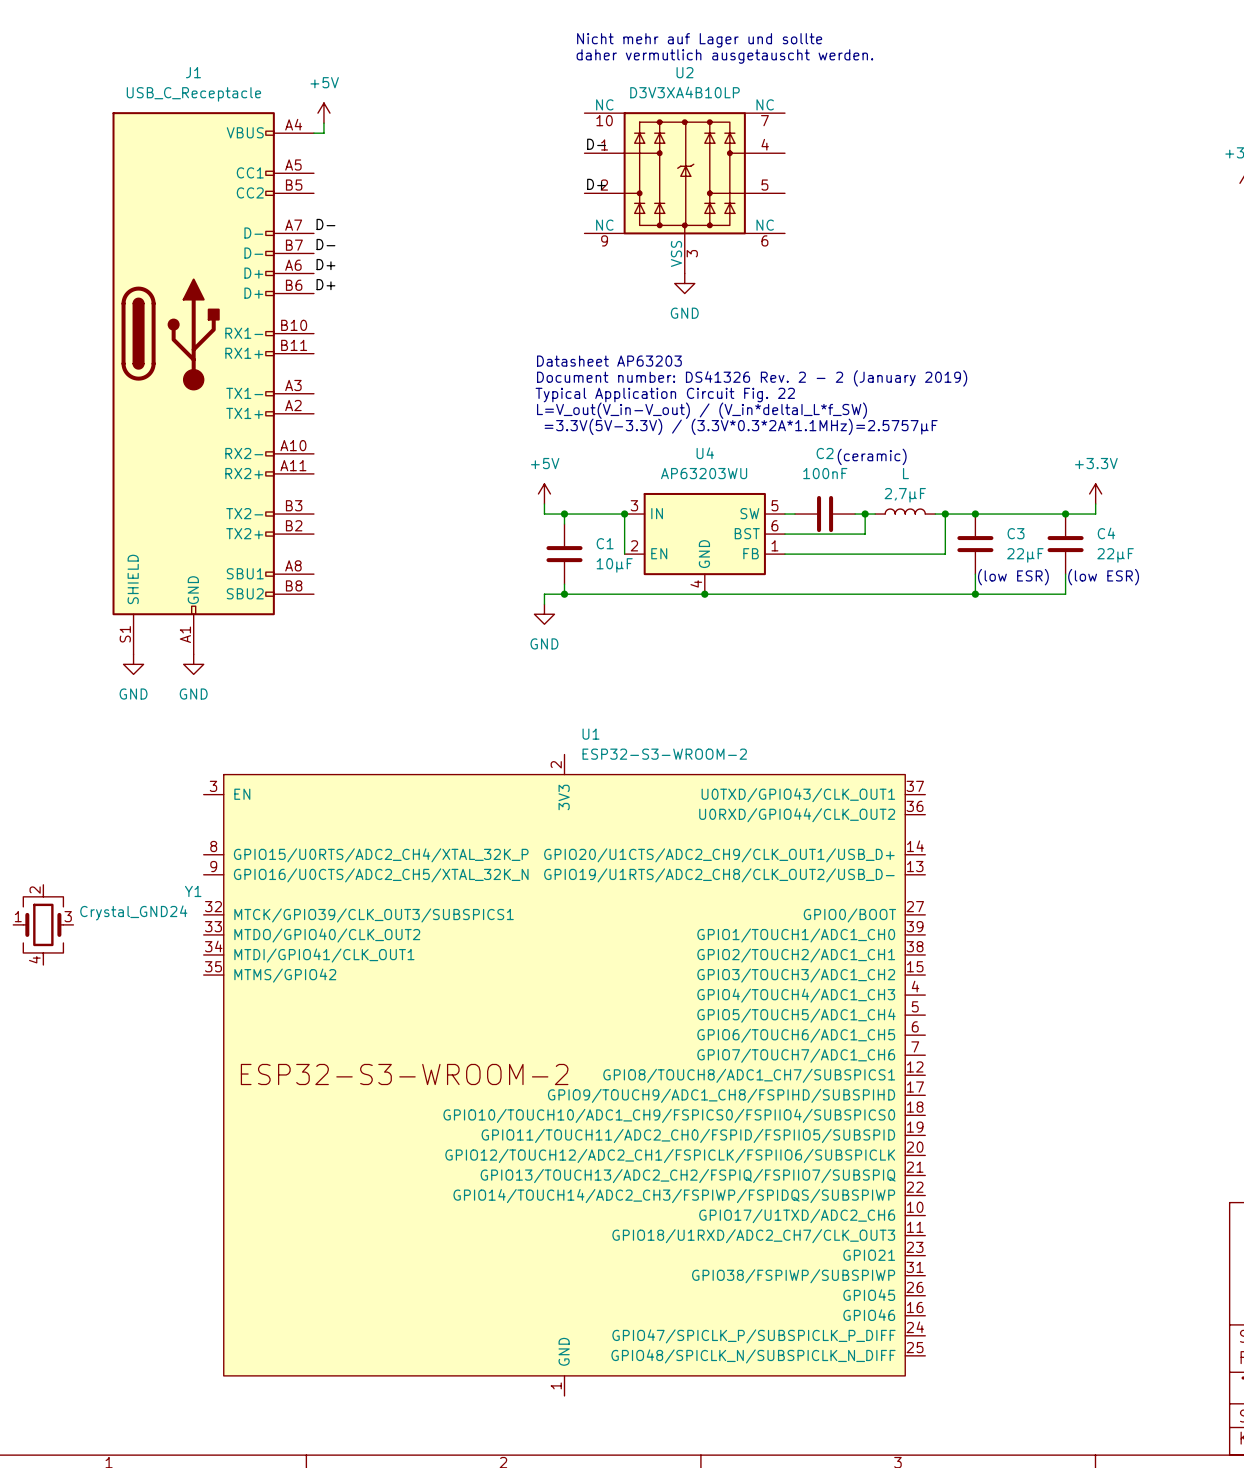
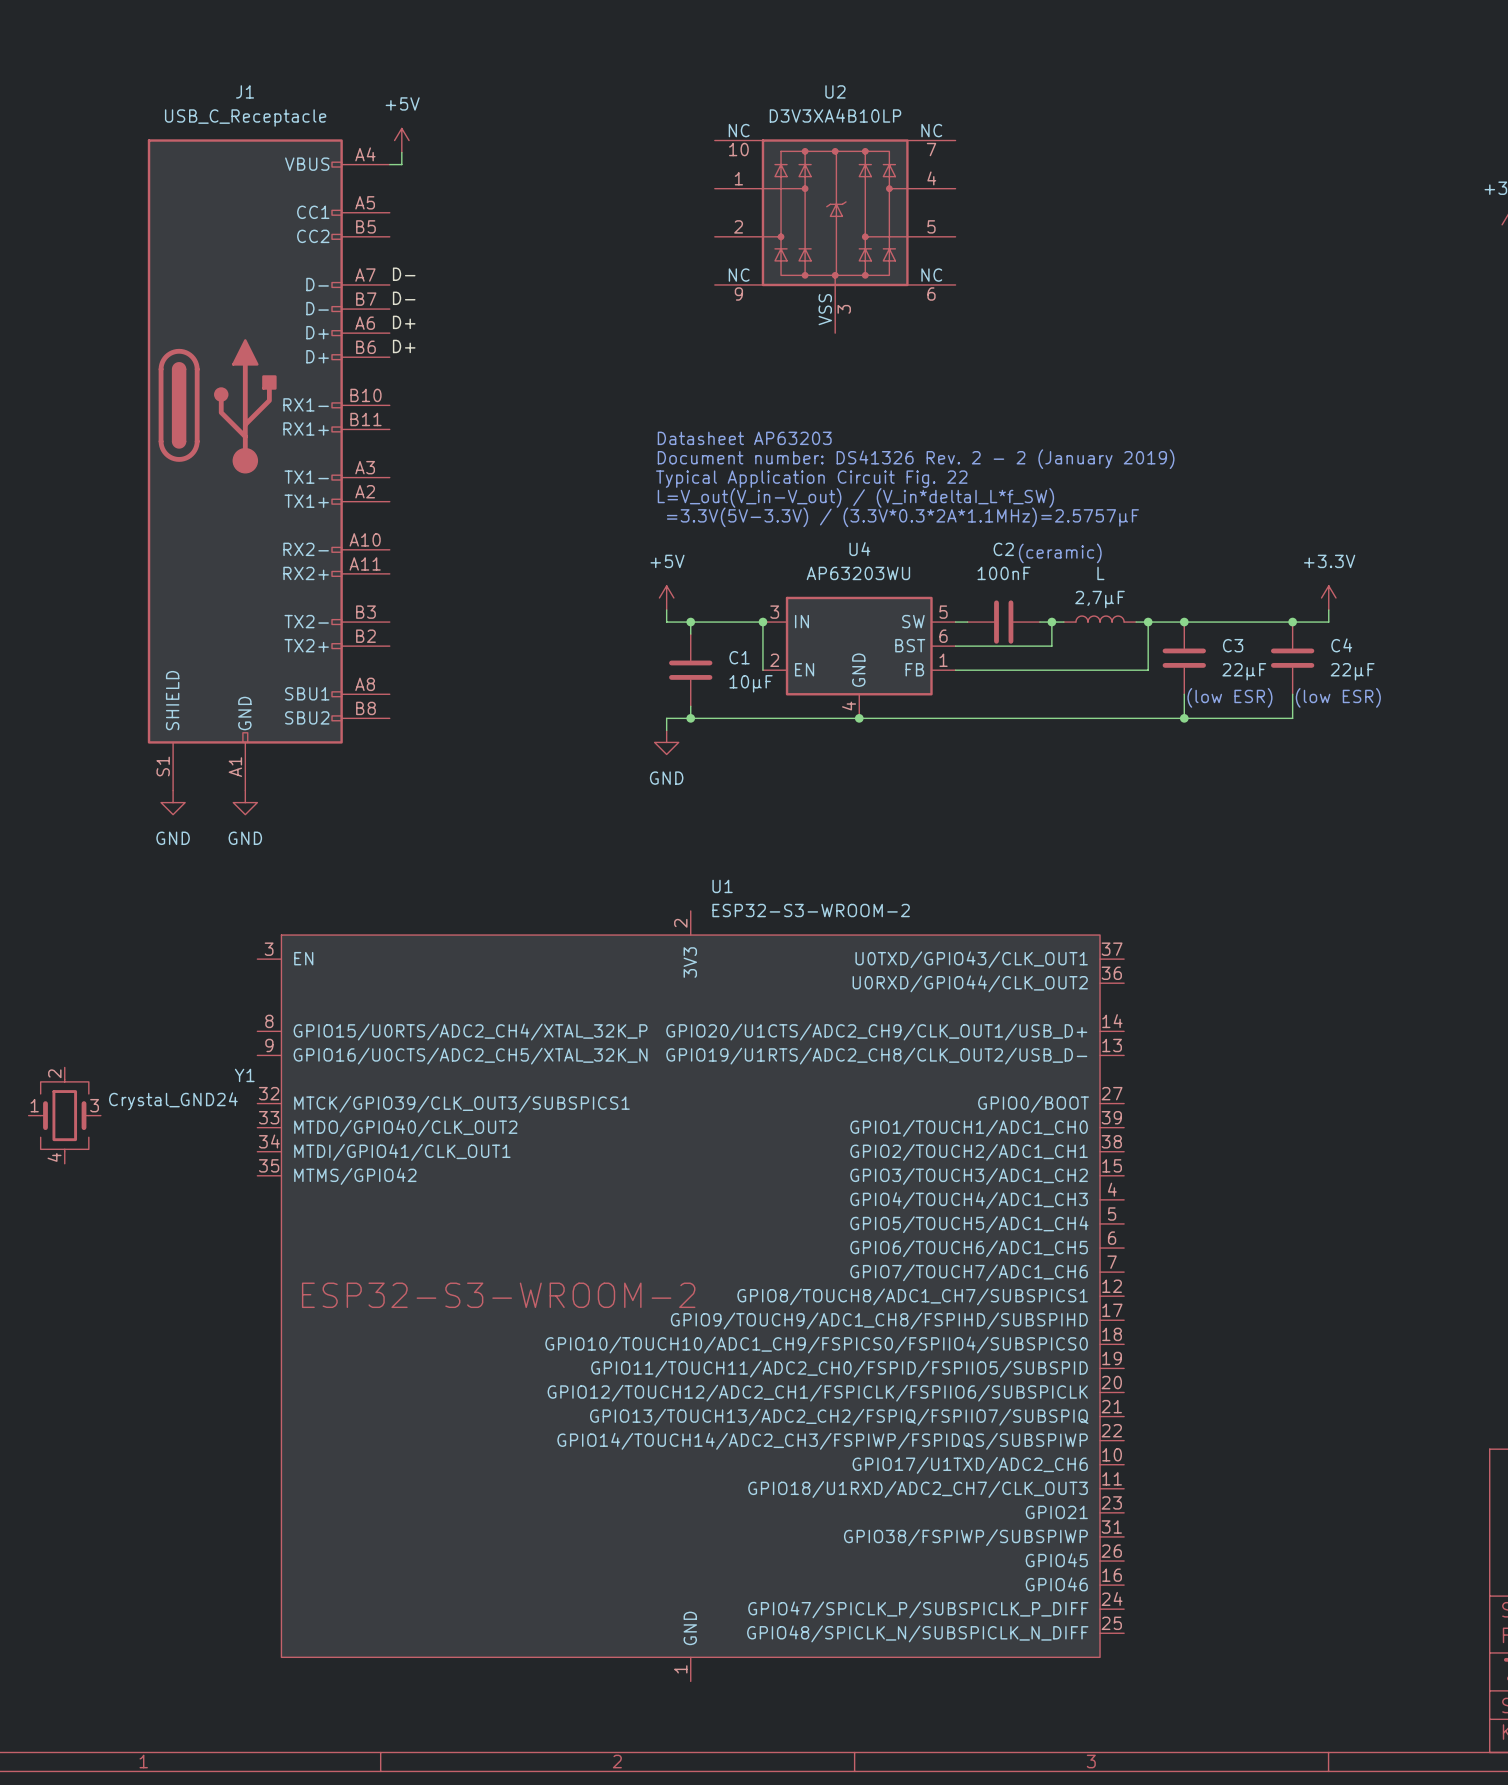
text: Nicht mehr auf Lager und sollte (699, 40) -> none
text: daher vermutlich ausgetauscht werden. (724, 56) -> none
label: D- (596, 144) -> none
label: D+ (596, 184) -> none
power symbol: GND (684, 283) -> none

